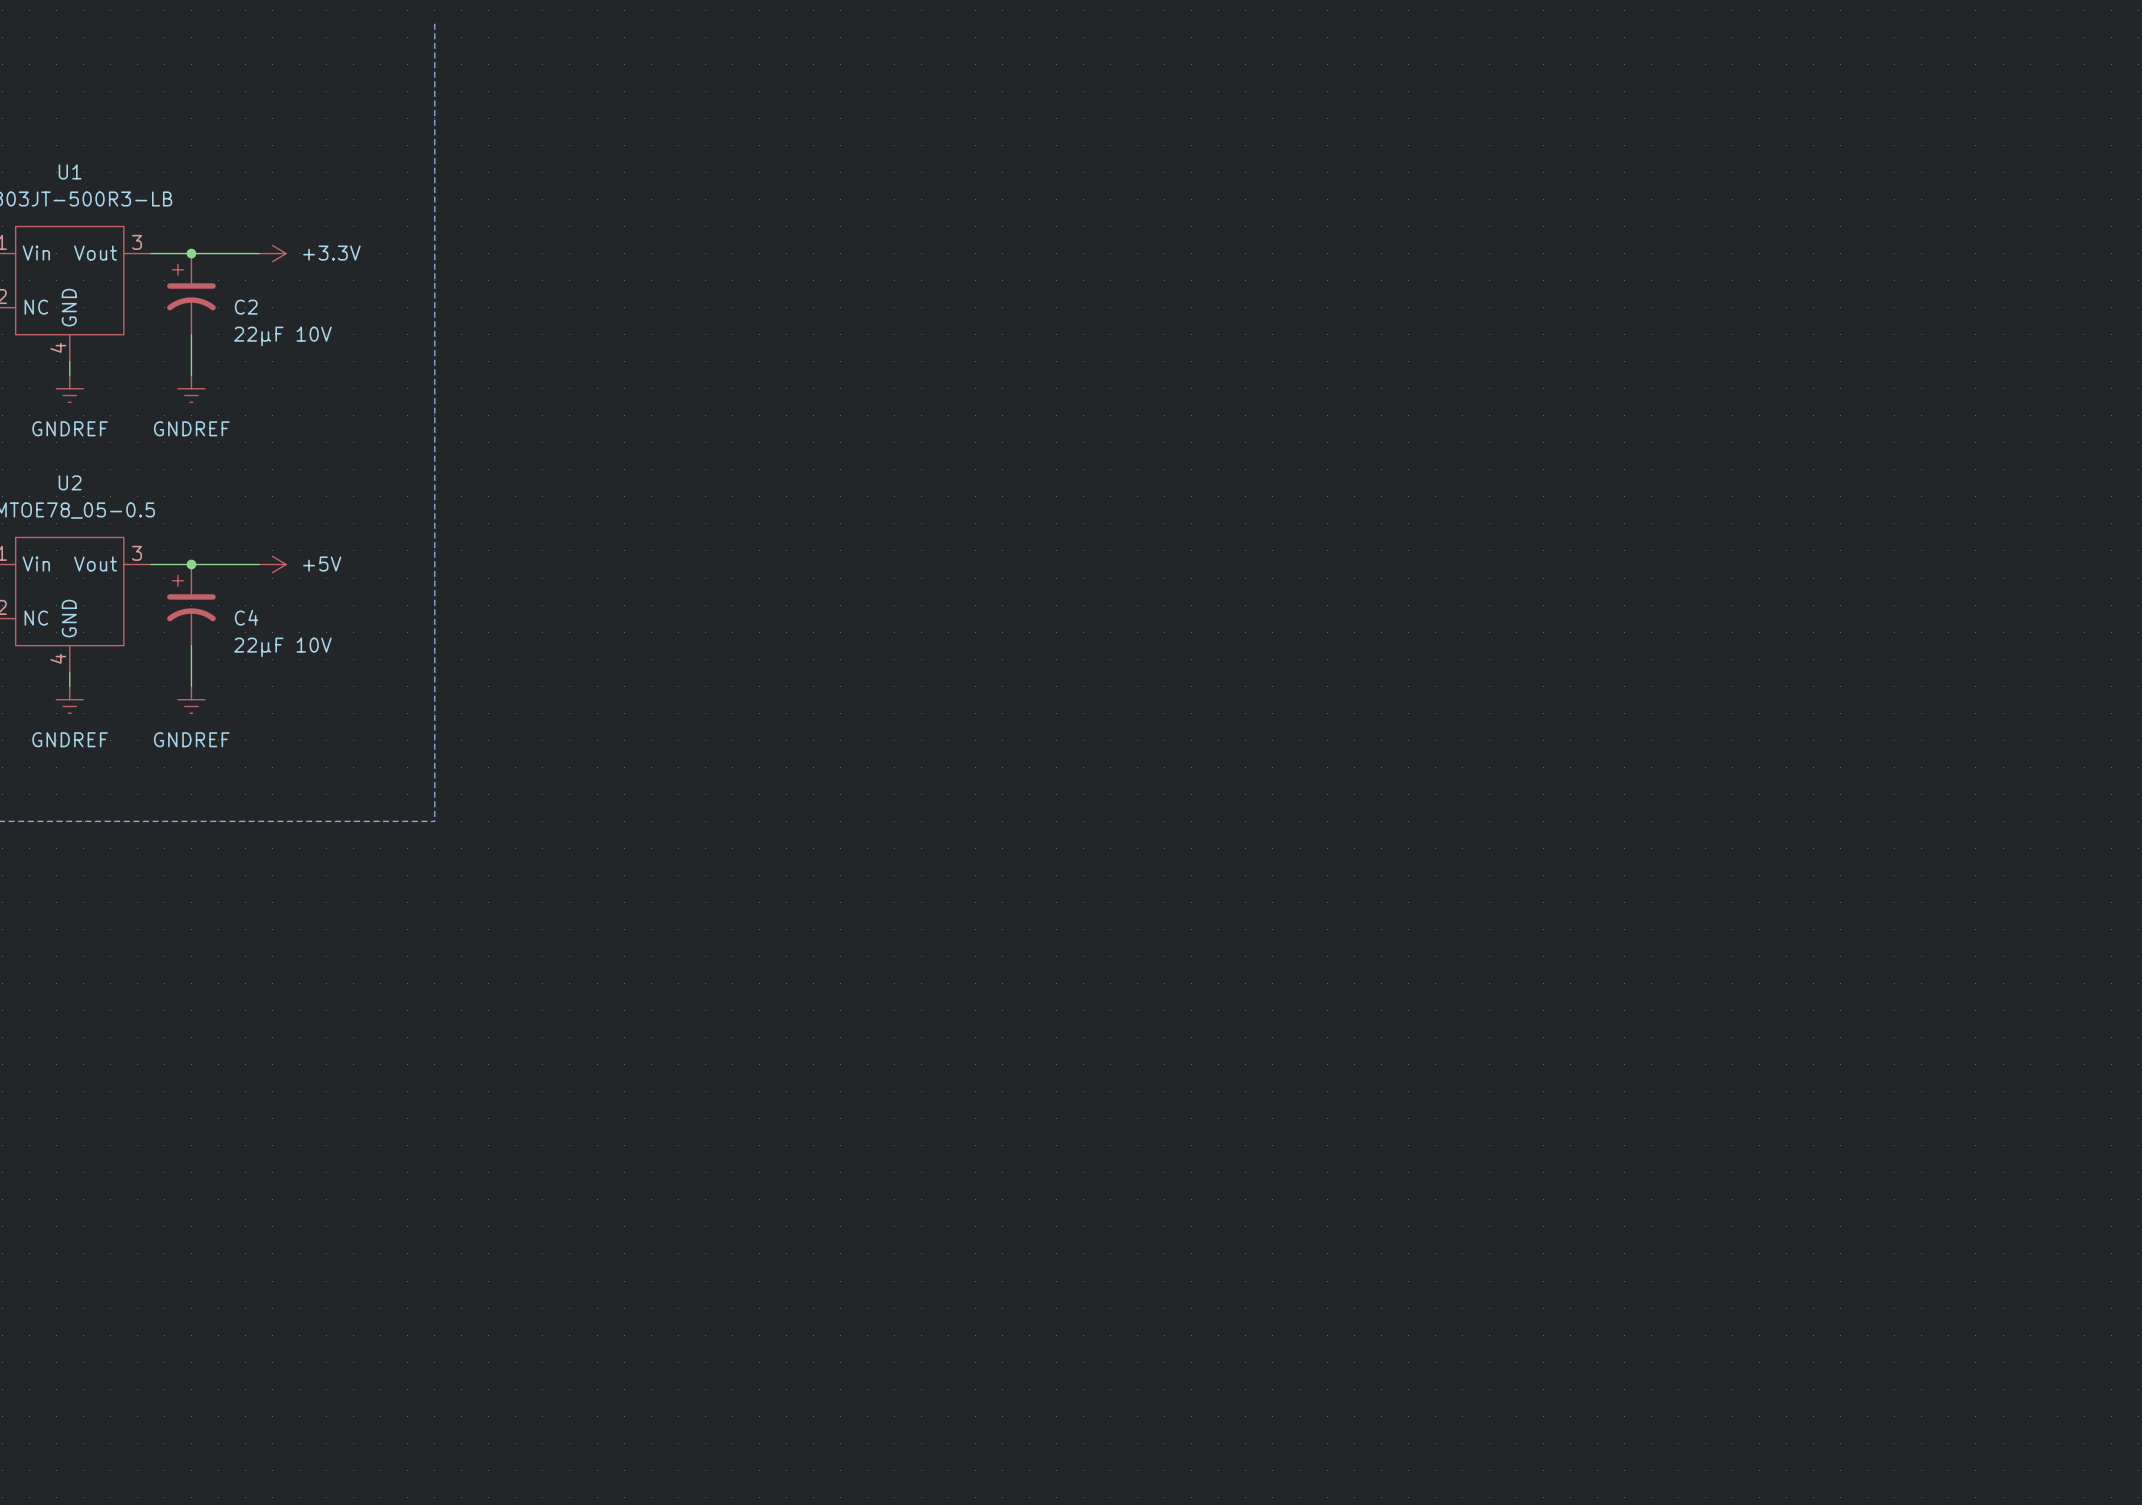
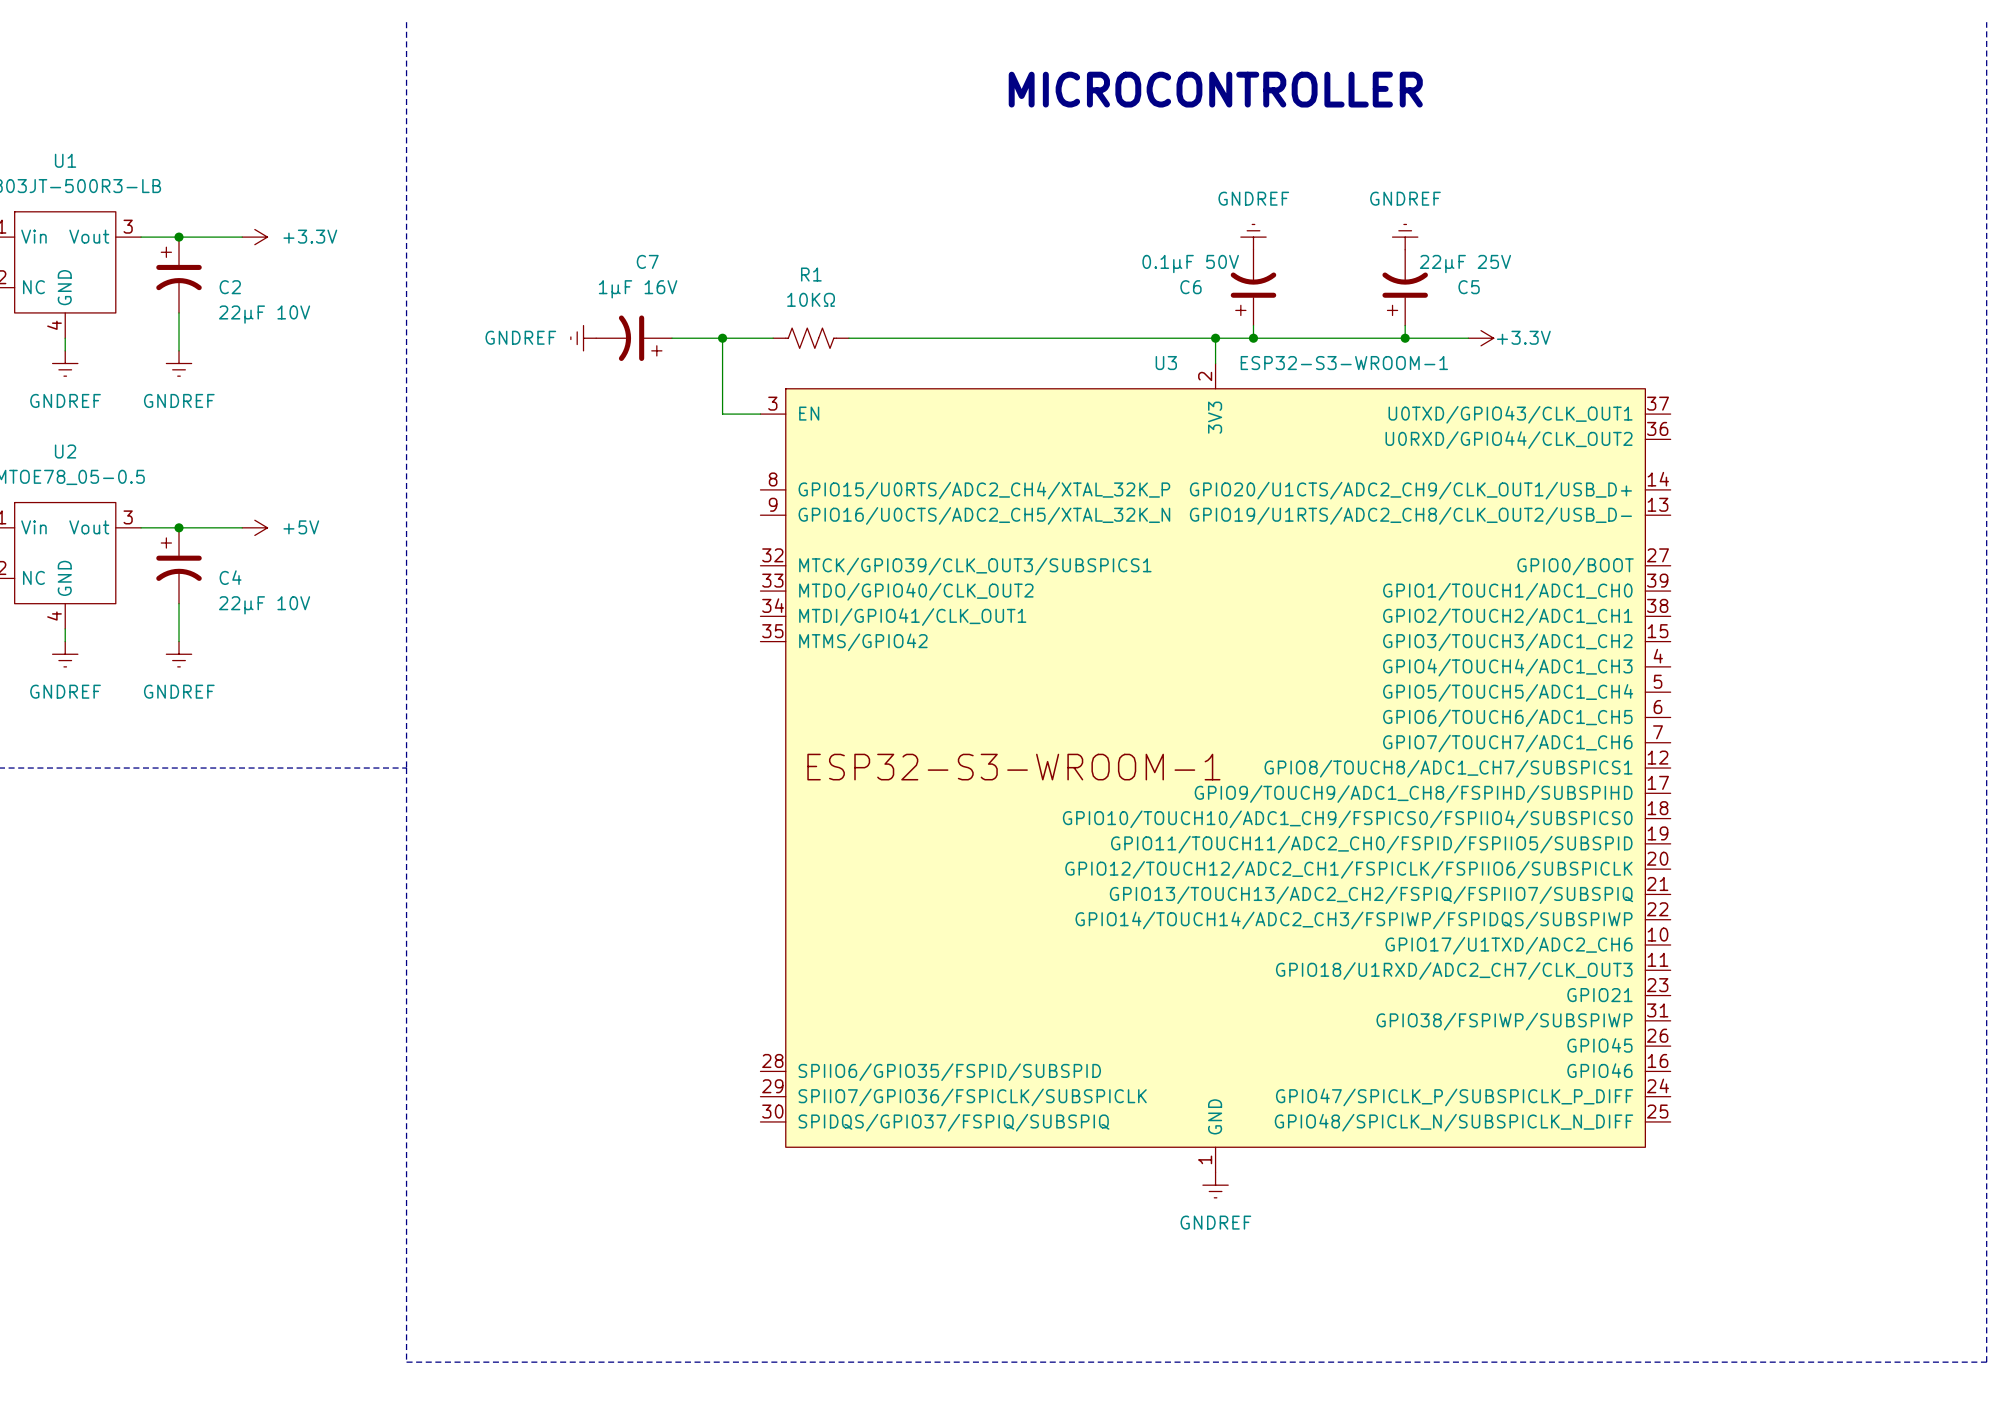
line: none -> (1986, 22) (1986, 1362) (406, 1362) (406, 768)
text: none -> MICROCONTROLLER (1215, 89)
power symbol: none -> GNDREF (1253, 237)
power symbol: none -> GNDREF (1405, 237)
C6: none -> 0.1µF 50V (1253, 287)
C5: none -> 22µF 25V (1405, 287)
wire: none -> (1253, 325) (1253, 338)
wire: none -> (1405, 325) (1405, 338)
power symbol: none -> GNDREF (583, 338)
C7: none -> 1µF 16V (634, 338)
wire: none -> (672, 338) (773, 338)
wire: none -> (722, 338) (722, 414) (760, 414)
junction: none -> (722, 338)
R1: none -> 10KΩ (811, 338)
wire: none -> (848, 338) (1468, 338)
wire: none -> (1215, 338) (1215, 363)
junction: none -> (1215, 338)
junction: none -> (1253, 338)
junction: none -> (1405, 338)
power symbol: none -> +3.3V (1481, 338)
U3: none -> ESP32-S3-WROOM-1 (1215, 768)
power symbol: none -> GNDREF (1215, 1185)

